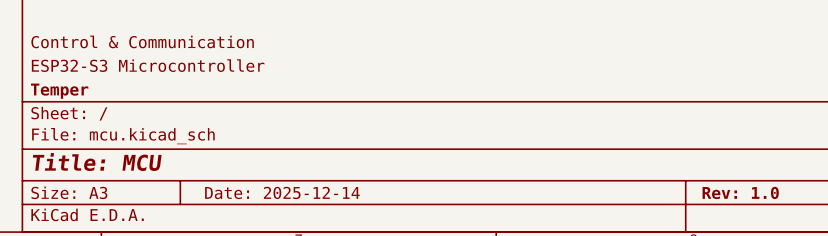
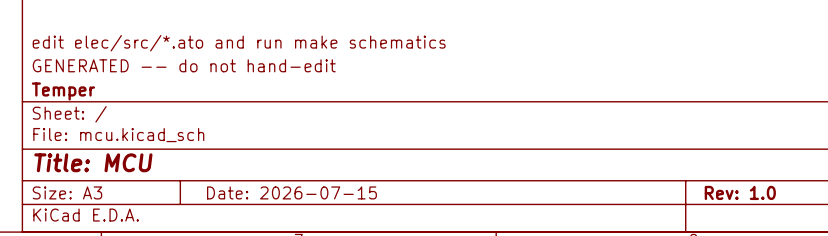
title block: Control & Communication (142, 41) -> edit elec/src/*.ato and run make schematics (239, 43)
title block: ESP32-S3 Microcontroller (148, 65) -> GENERATED -- do not hand-edit (184, 65)
title block: Date: 2025-12-14 (282, 192) -> Date: 2026-07-15 (291, 192)

